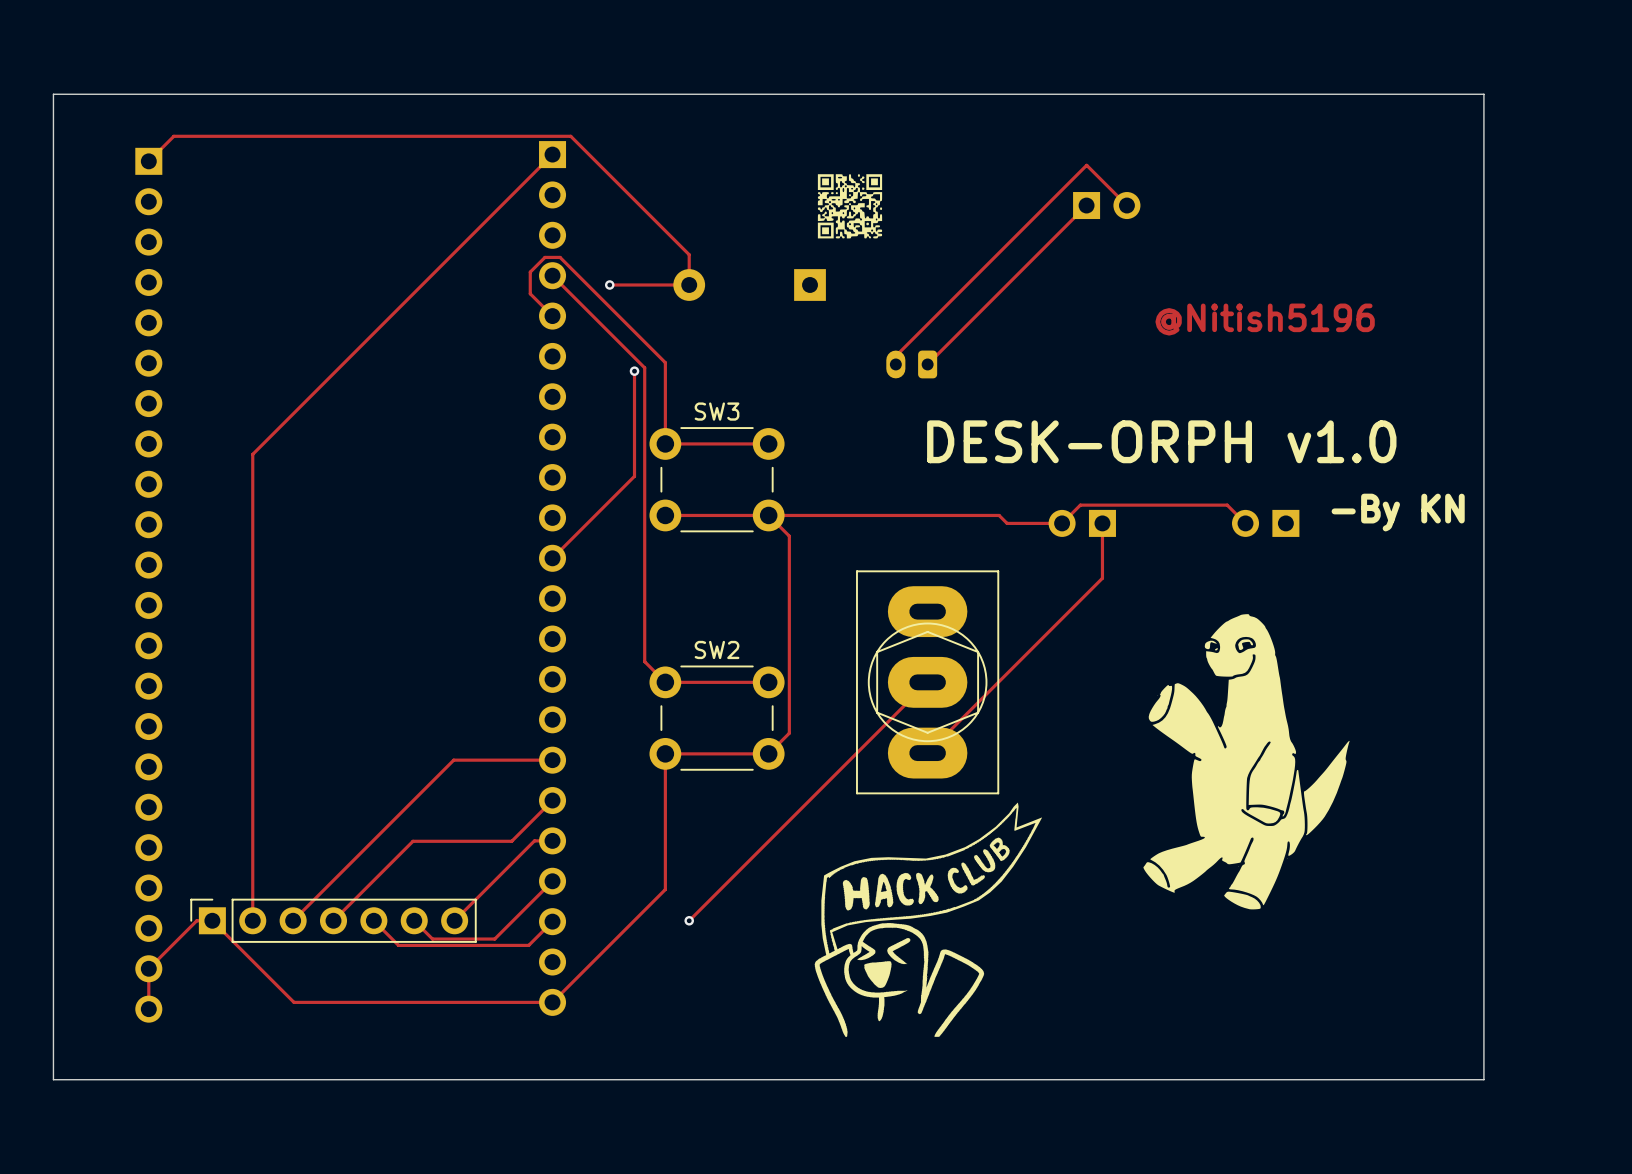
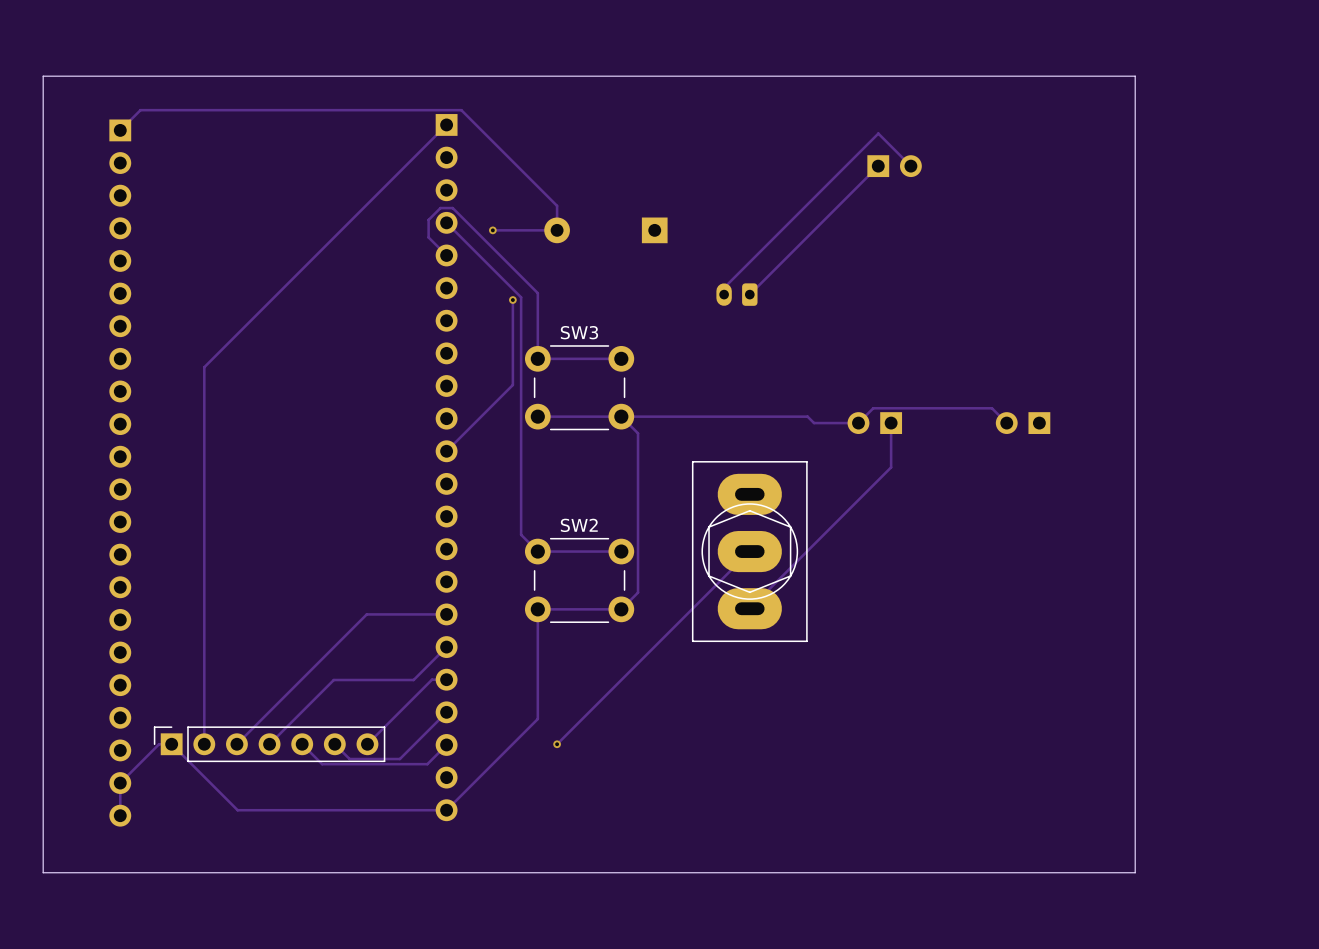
board edge: (1404, 94) (1483, 94) (1483, 1079) (1404, 1079) -> (1135, 76) (1135, 872)
drawing: [817, 174, 883, 239] -> none
text: @Nitish5196 (1265, 319) -> none
text: DESK-ORPH v1.0 (1161, 441) -> none
text: -By KN (1398, 512) -> none
drawing: [1143, 614, 1350, 910] -> none
drawing: [814, 802, 1043, 1037] -> none

